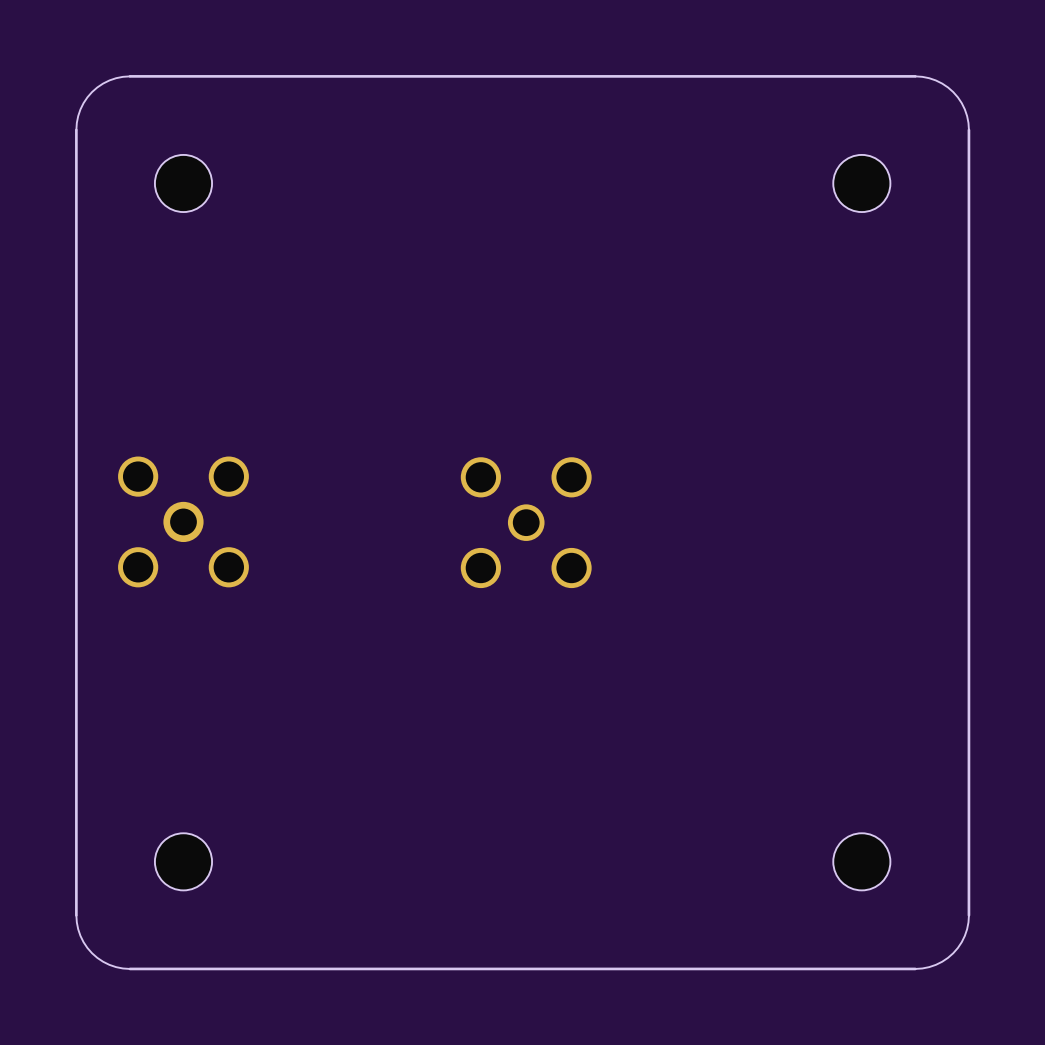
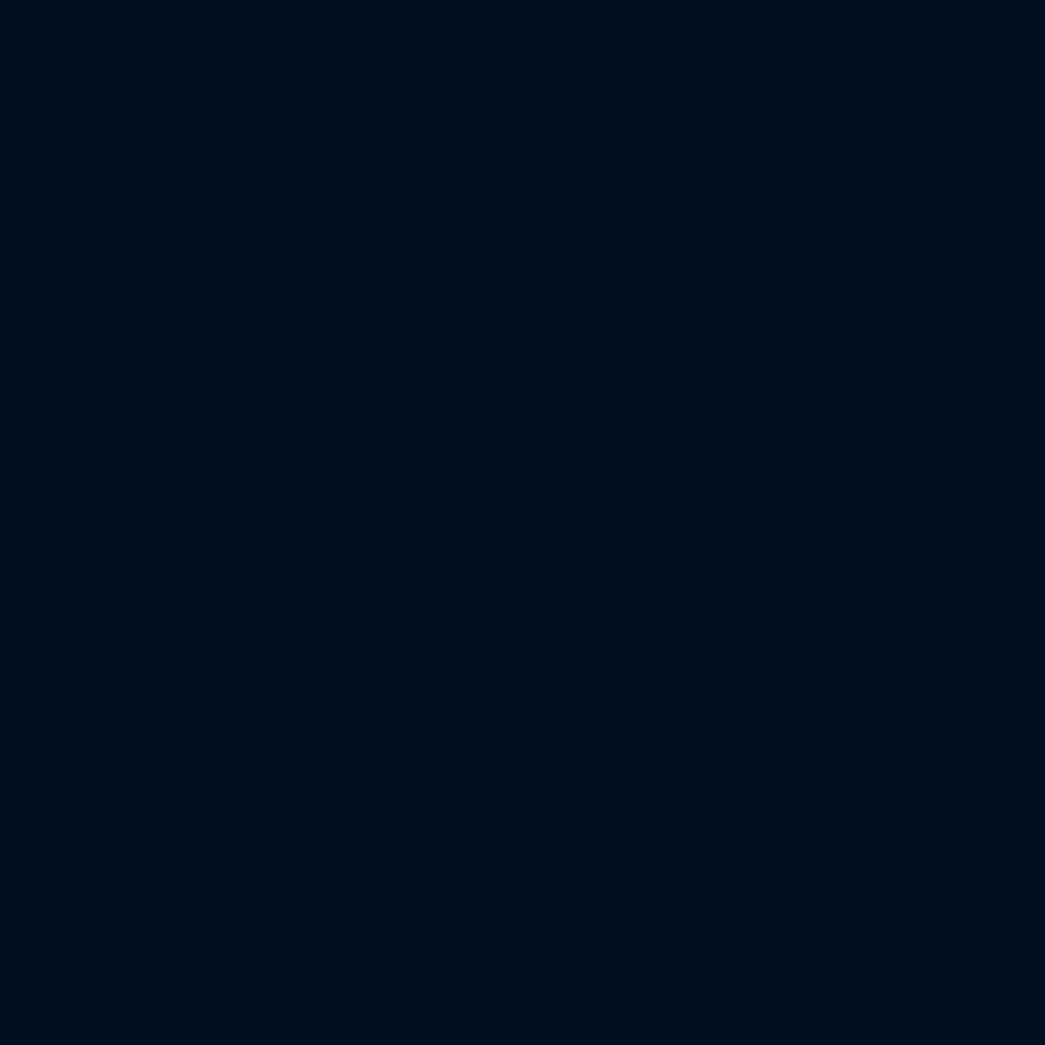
board edge: (915, 76) (129, 76) (109, 80) (92, 92) (80, 109) (76, 129) (76, 915) (80, 935) (92, 953) (109, 964) (129, 968) (915, 968) (935, 964) (953, 953) (964, 935) (968, 915) (968, 129) (964, 109) (953, 92) (935, 80) (915, 76) -> none
part: (183, 183) -> none
part: (861, 183) -> none
part: (183, 521) -> none
part: (526, 522) -> none
part: (183, 861) -> none
part: (861, 861) -> none

